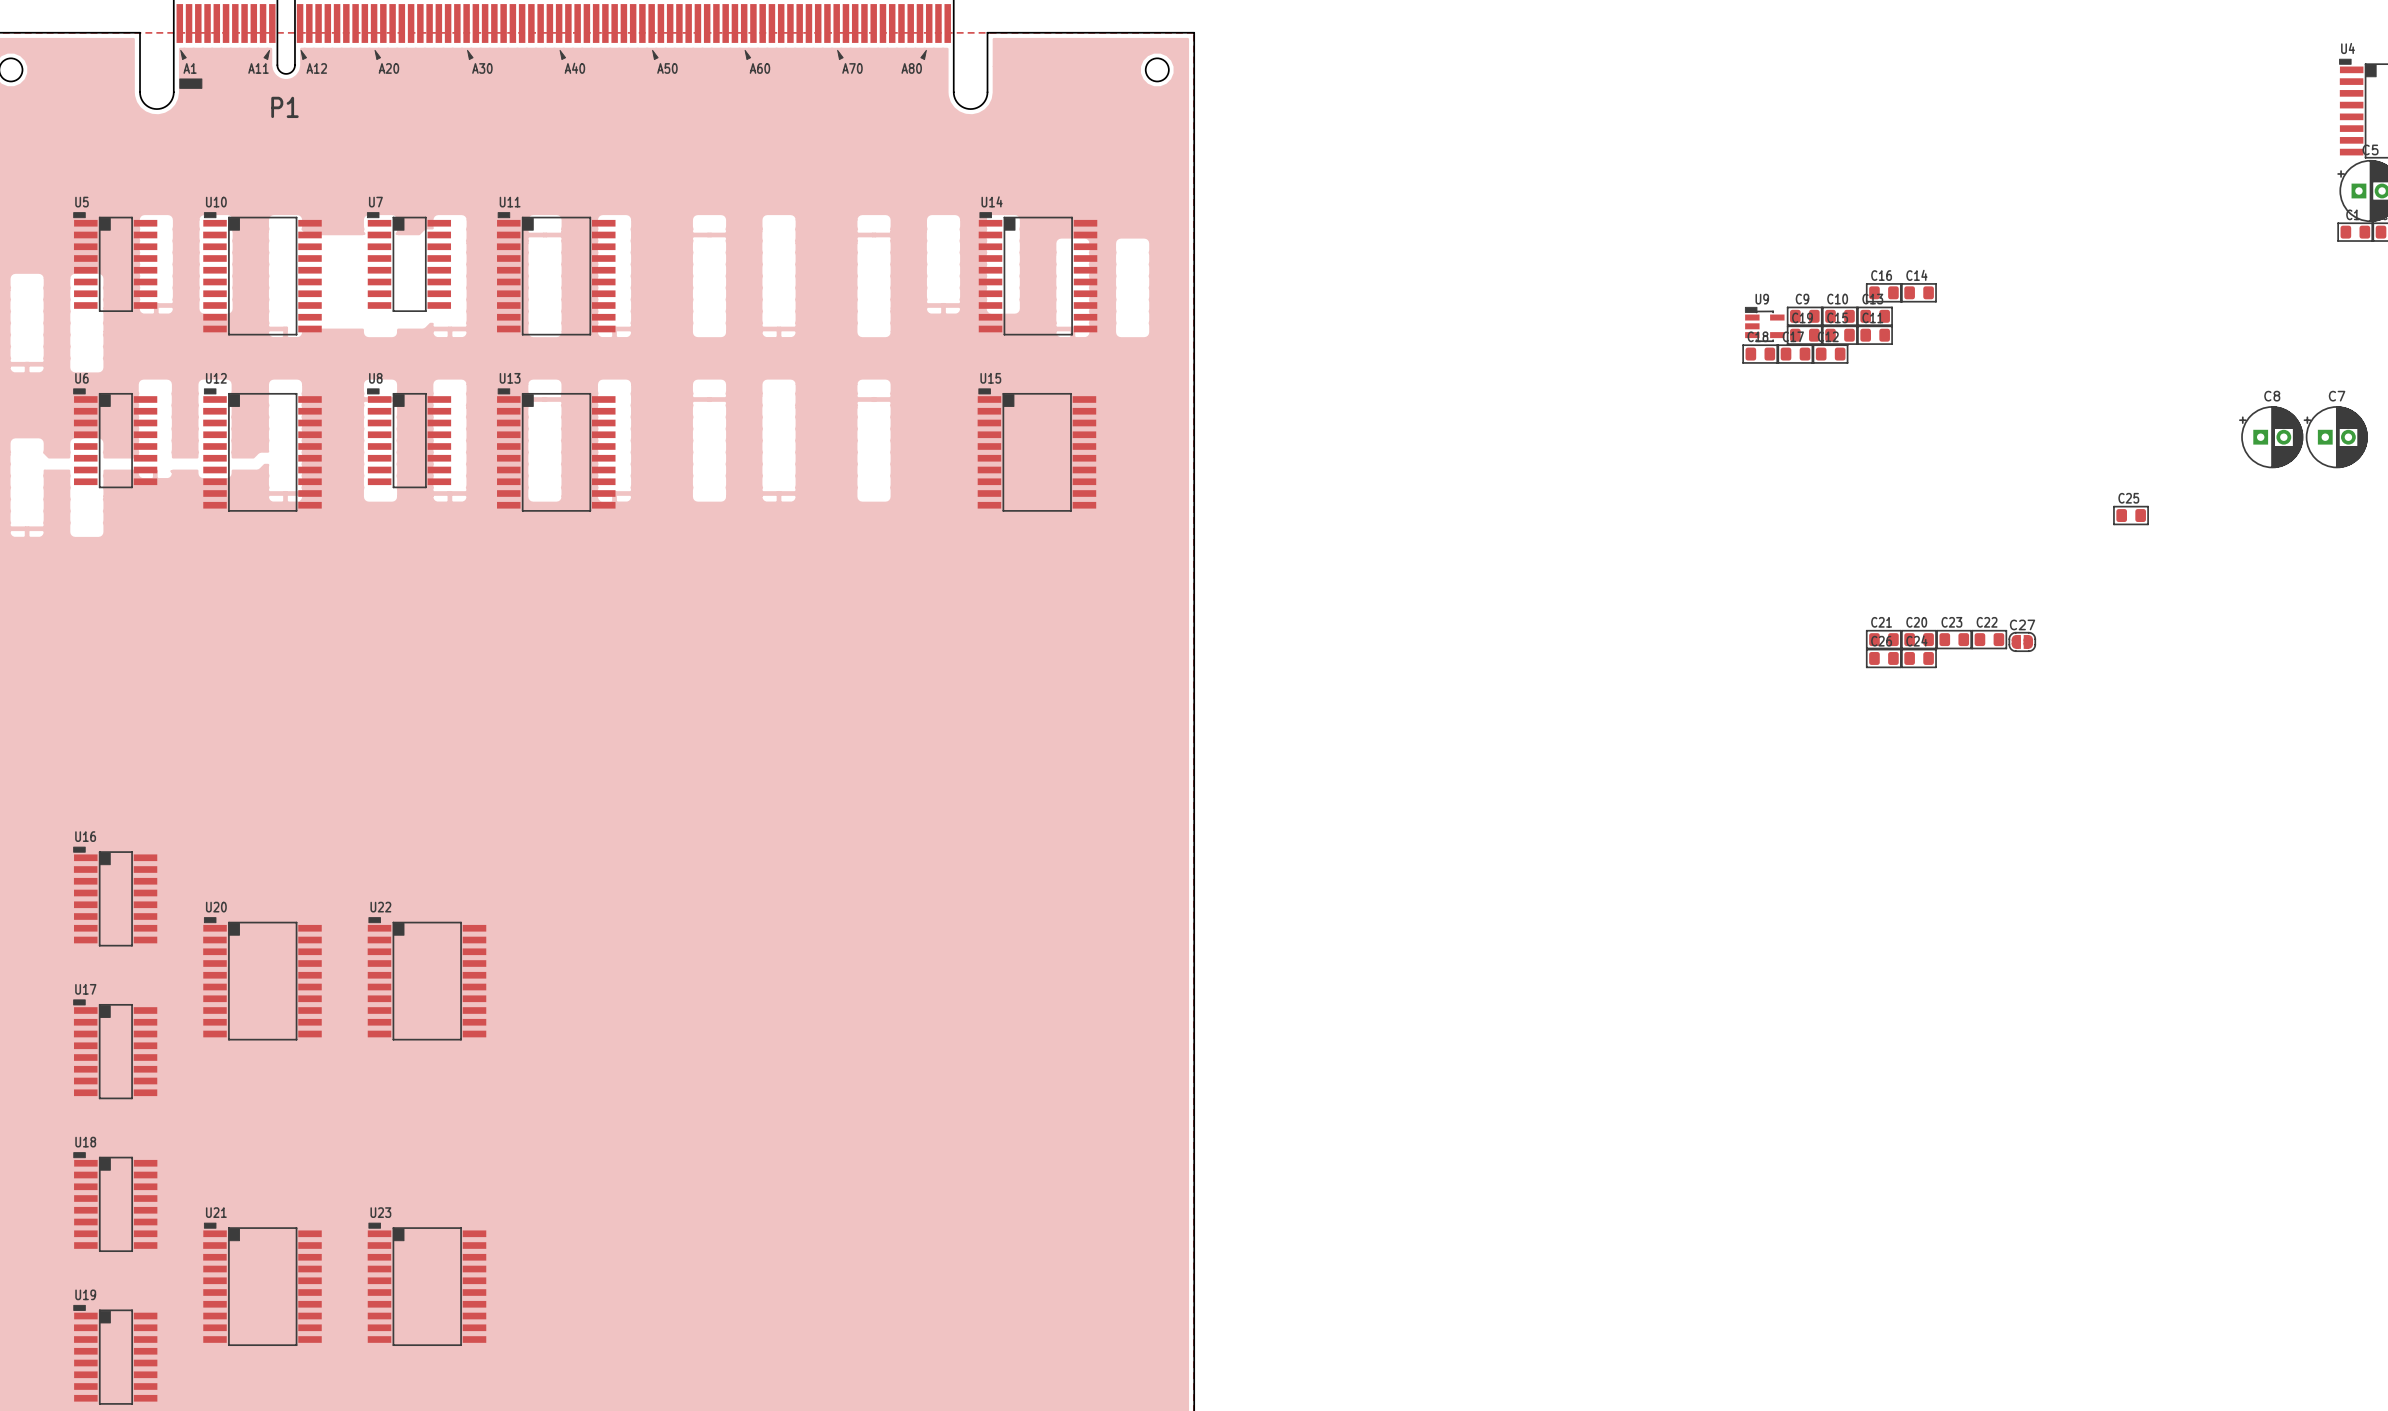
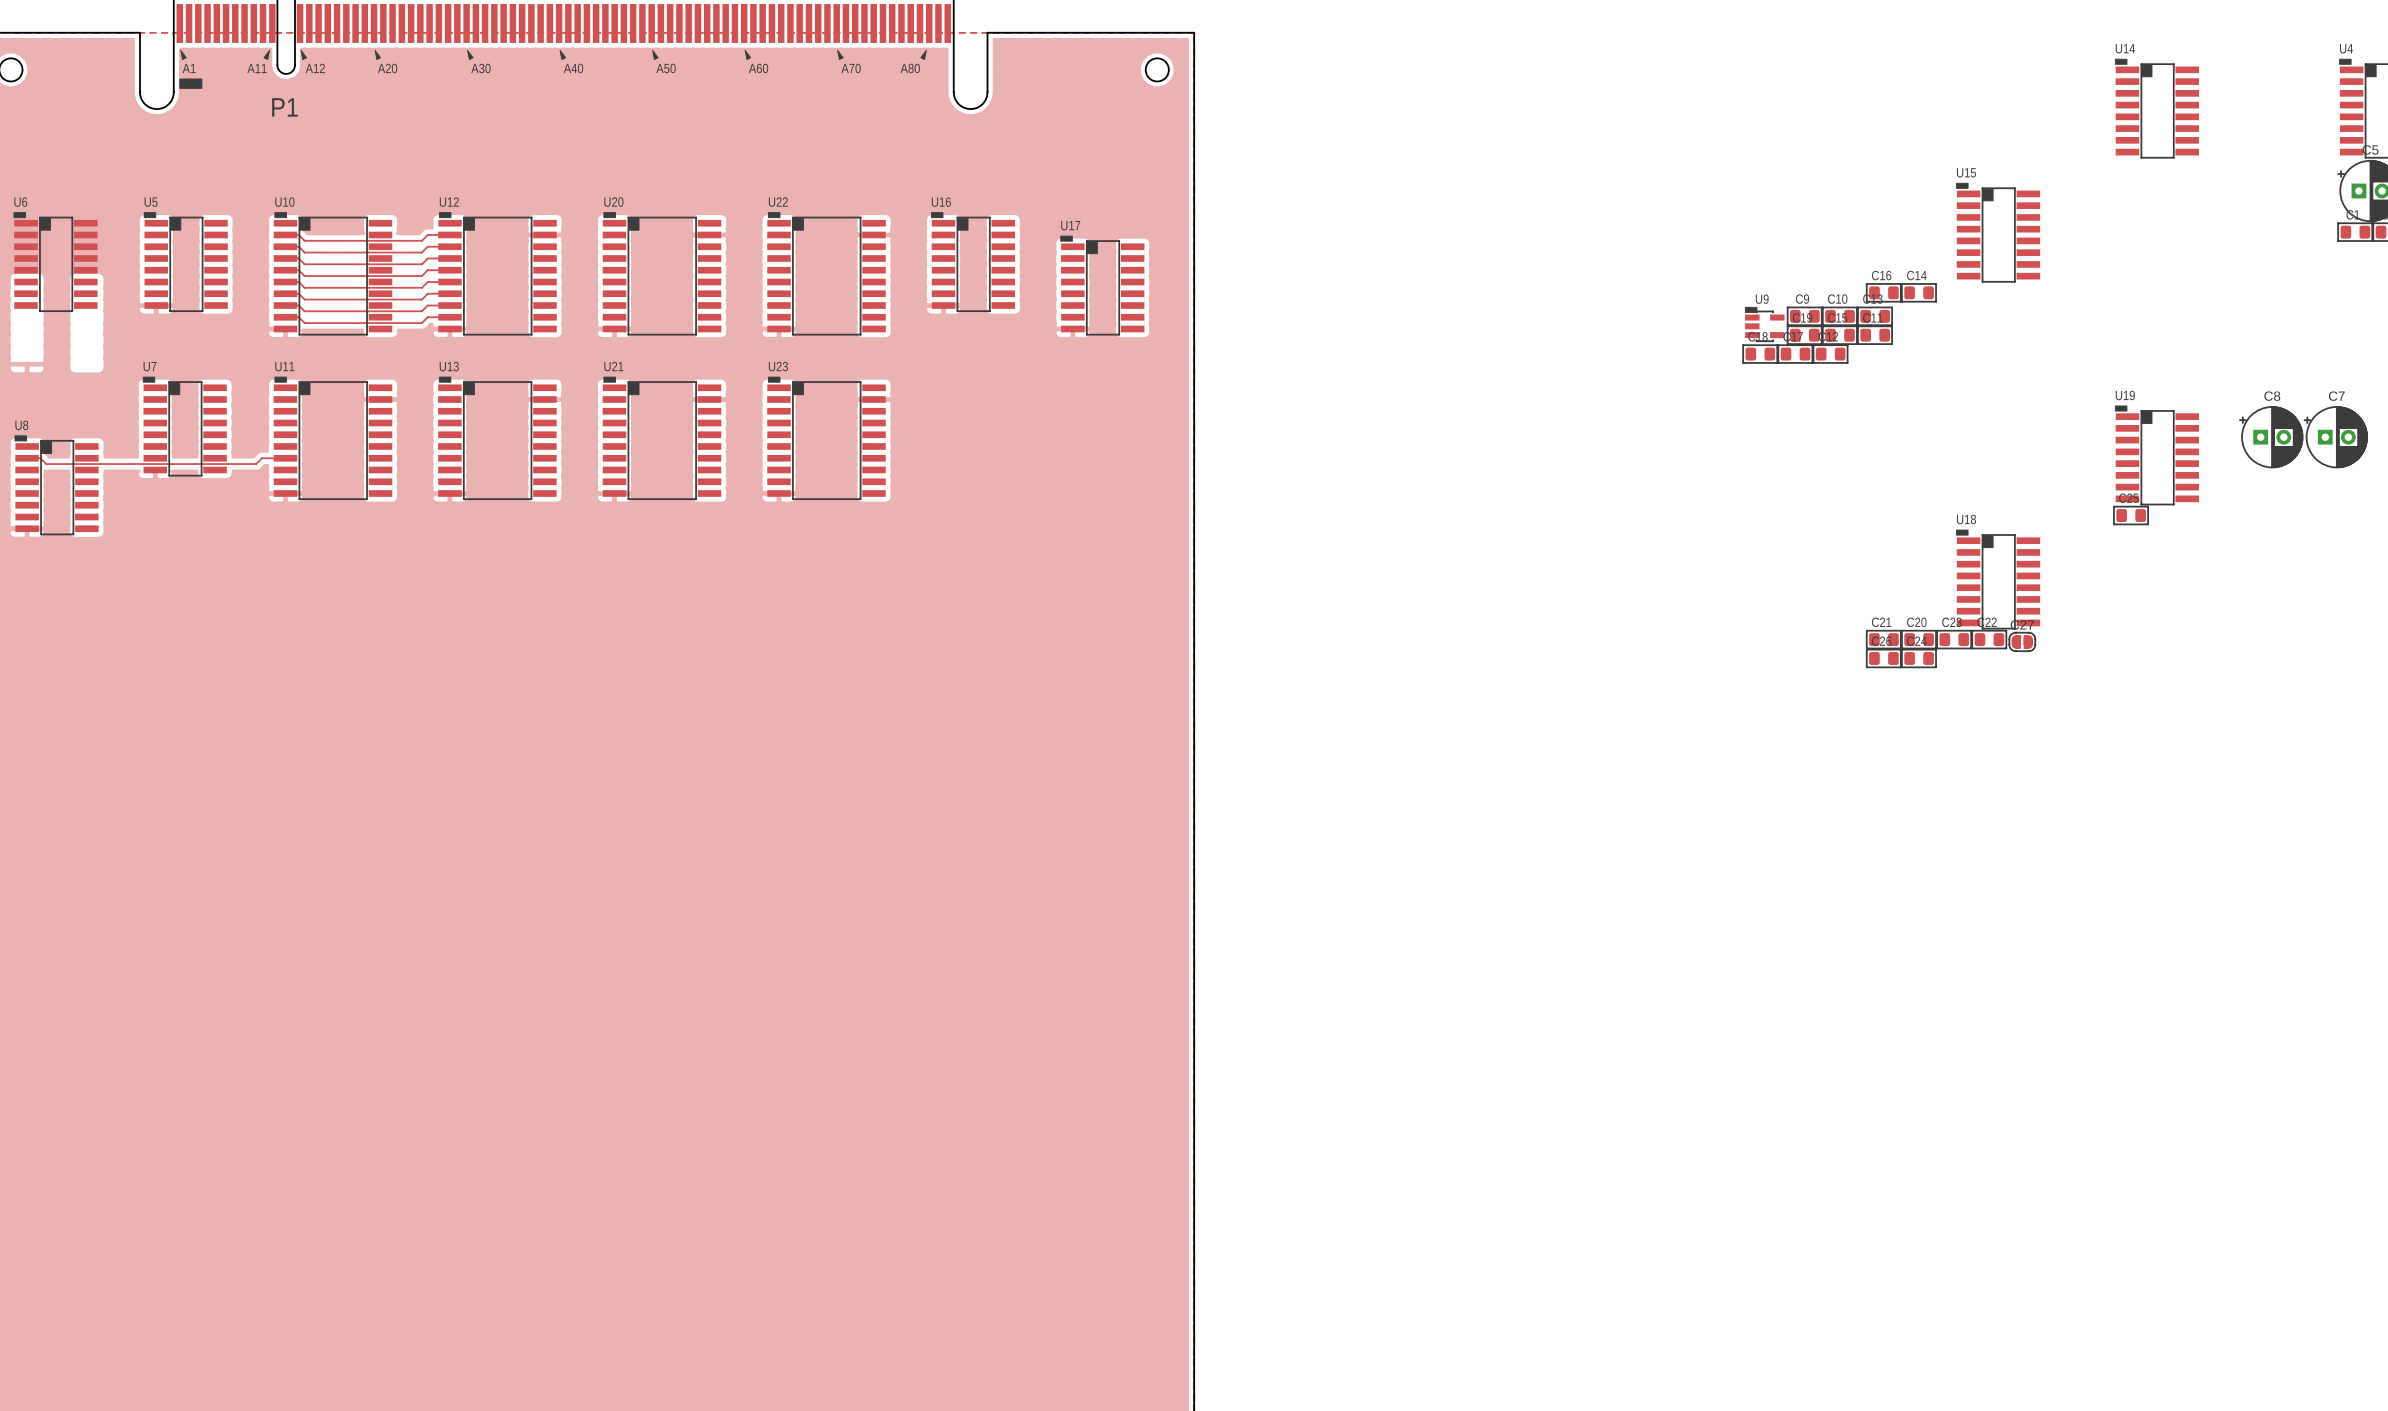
U14 name position: U14 (992, 201) -> U14 (2125, 48)
U14 footprint: [978, 212, 1098, 336] -> [2114, 58, 2199, 159]
track: none -> (285, 234) (298, 234) (304, 240) (421, 240) (427, 234) (450, 234)
track: none -> (285, 246) (298, 246) (304, 252) (421, 252) (427, 246) (450, 246)
track: none -> (285, 258) (298, 258) (304, 264) (421, 264) (427, 258) (450, 258)
U5 position: (115, 261) -> (185, 261)
U7 position: (408, 261) -> (184, 426)
track: none -> (285, 270) (298, 270) (304, 276) (421, 276) (427, 270) (450, 270)
U10 position: (262, 273) -> (332, 273)
U11 position: (556, 273) -> (332, 438)
track: none -> (285, 282) (298, 282) (304, 287) (421, 287) (427, 282) (450, 282)
track: none -> (285, 293) (298, 293) (304, 299) (421, 299) (427, 293) (450, 293)
track: none -> (285, 305) (298, 305) (304, 311) (421, 311) (427, 305) (450, 305)
track: none -> (285, 317) (298, 317) (304, 323) (421, 323) (427, 317) (450, 317)
U15 name position: U15 (990, 378) -> U15 (1966, 172)
U15 footprint: [977, 388, 1097, 512] -> [1956, 182, 2041, 283]
U6 position: (115, 438) -> (55, 261)
U8 position: (409, 438) -> (56, 485)
U12 position: (262, 449) -> (497, 273)
U13 position: (556, 449) -> (497, 438)
track: none -> (27, 458) (40, 458) (46, 464) (256, 464) (262, 458) (285, 458)
U16 position: (115, 896) -> (972, 261)
U20 position: (262, 978) -> (661, 273)
U22 position: (426, 978) -> (826, 273)
U17 position: (115, 1049) -> (1102, 285)
U18 position: (115, 1202) -> (1998, 579)
U21 position: (262, 1284) -> (661, 438)
U23 position: (426, 1284) -> (826, 438)
U19 position: (115, 1354) -> (2156, 455)

